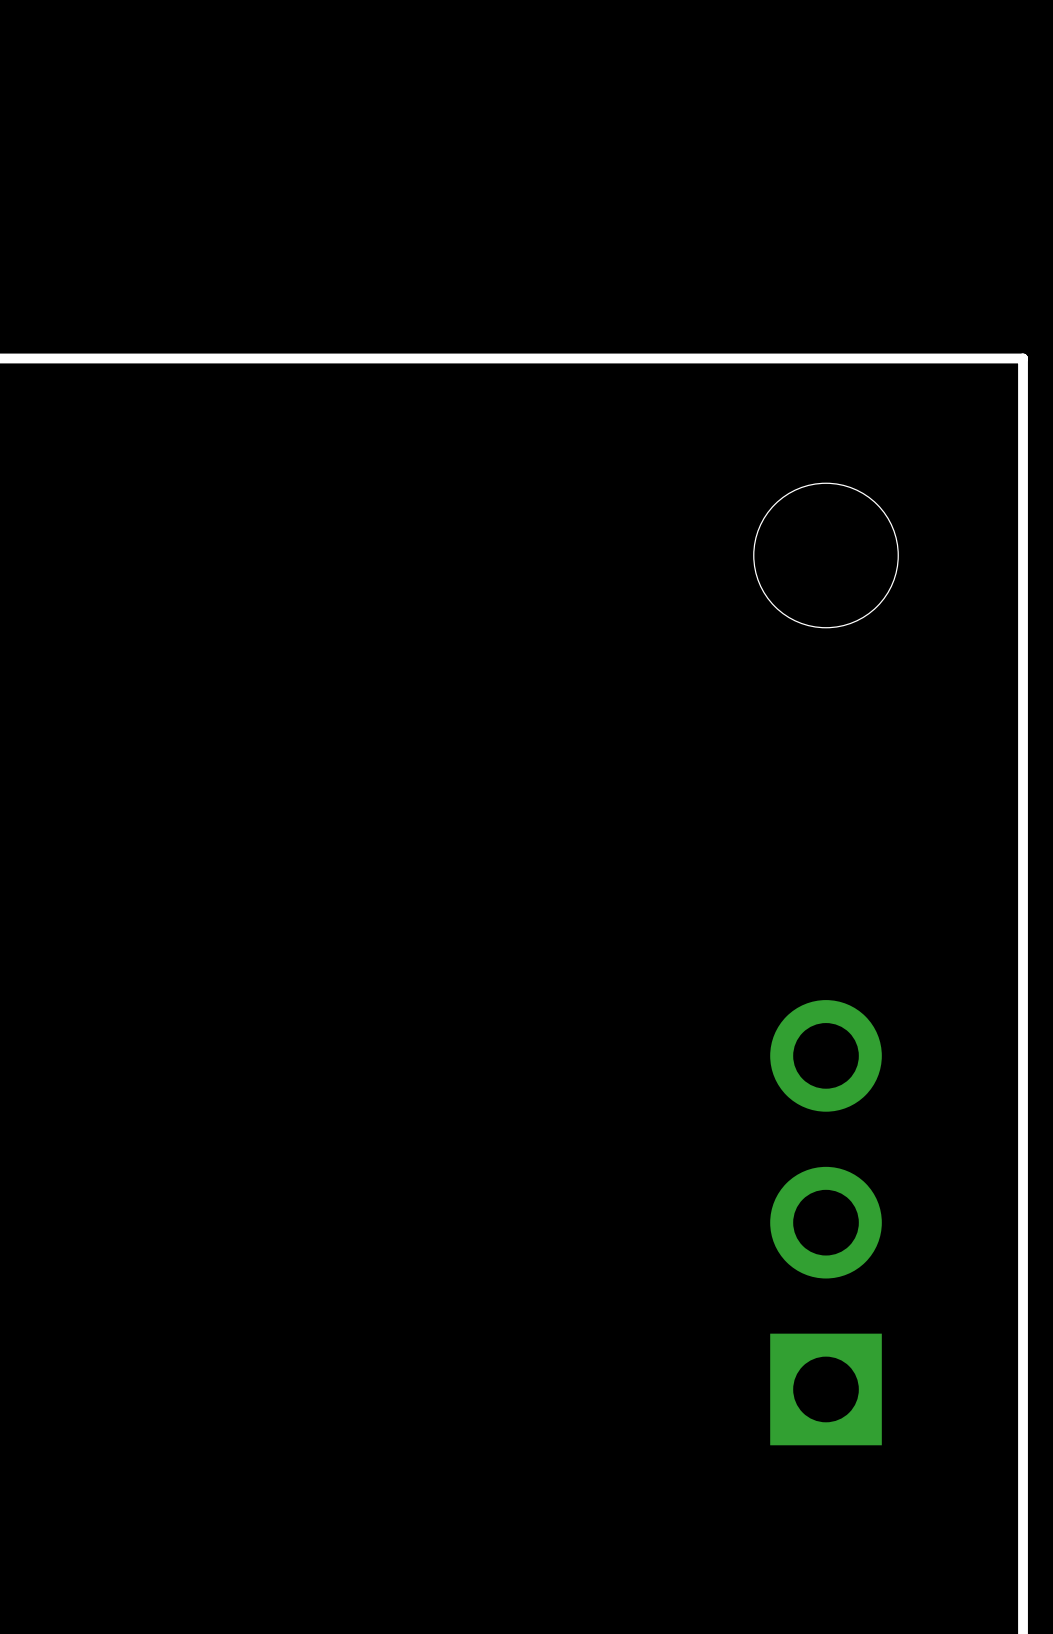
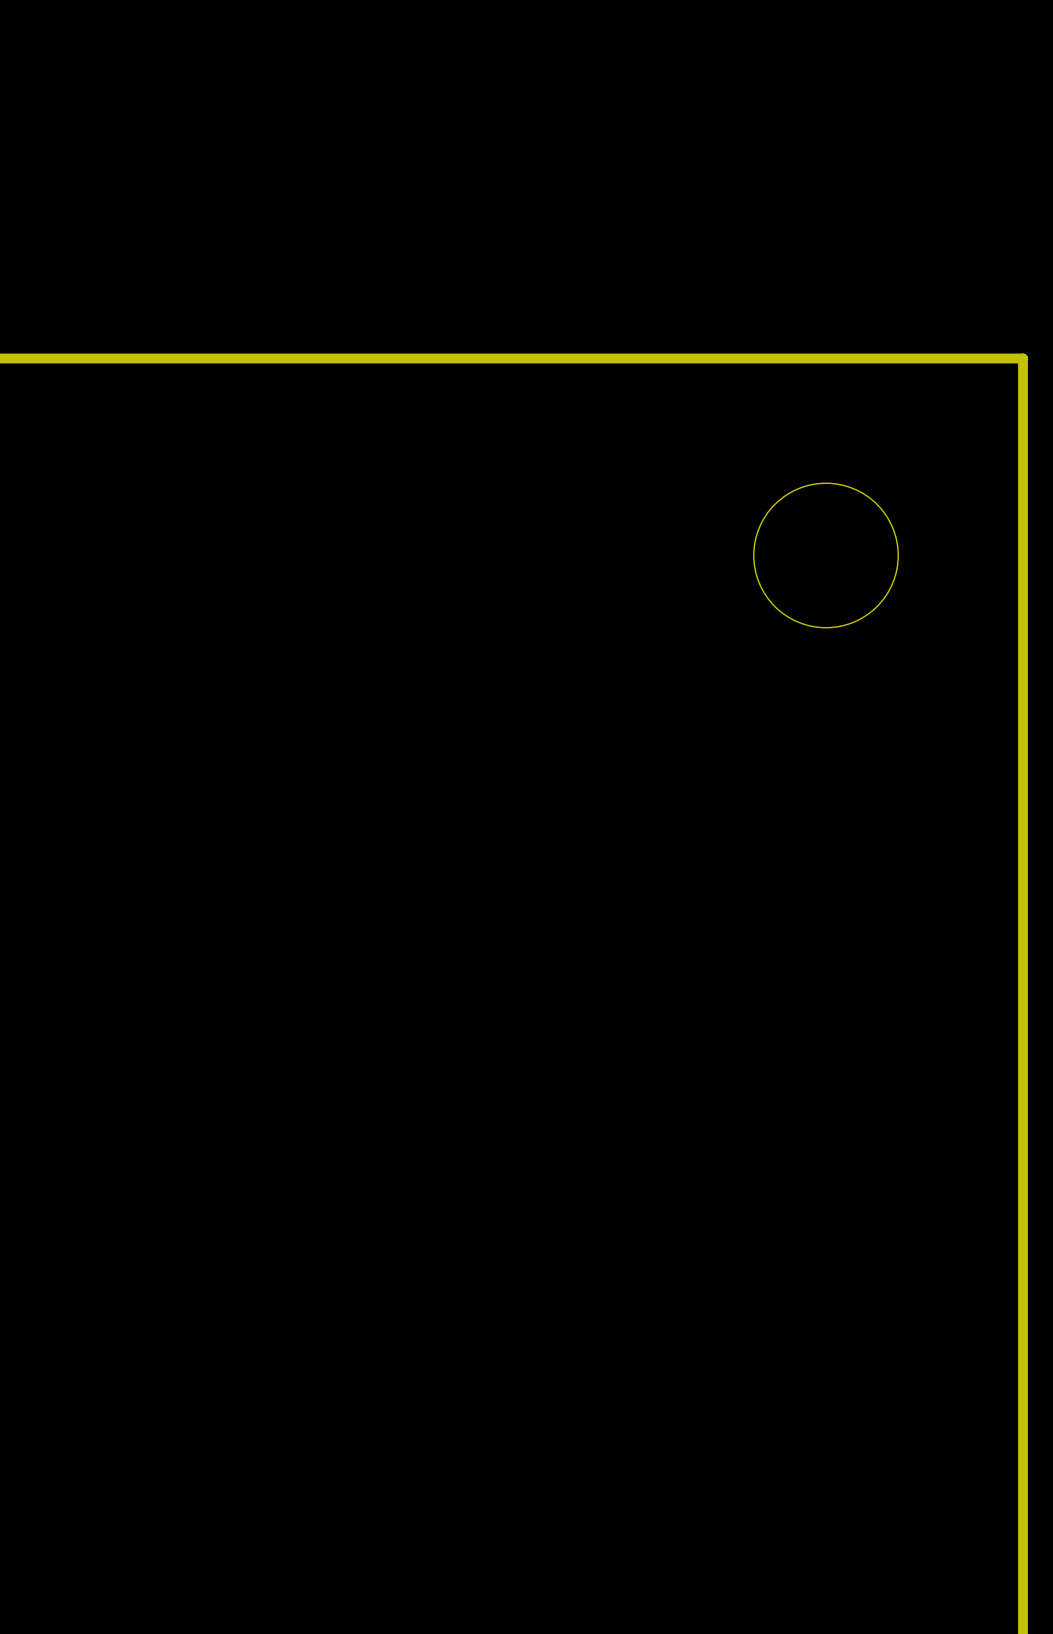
part: (826, 1222) -> none

